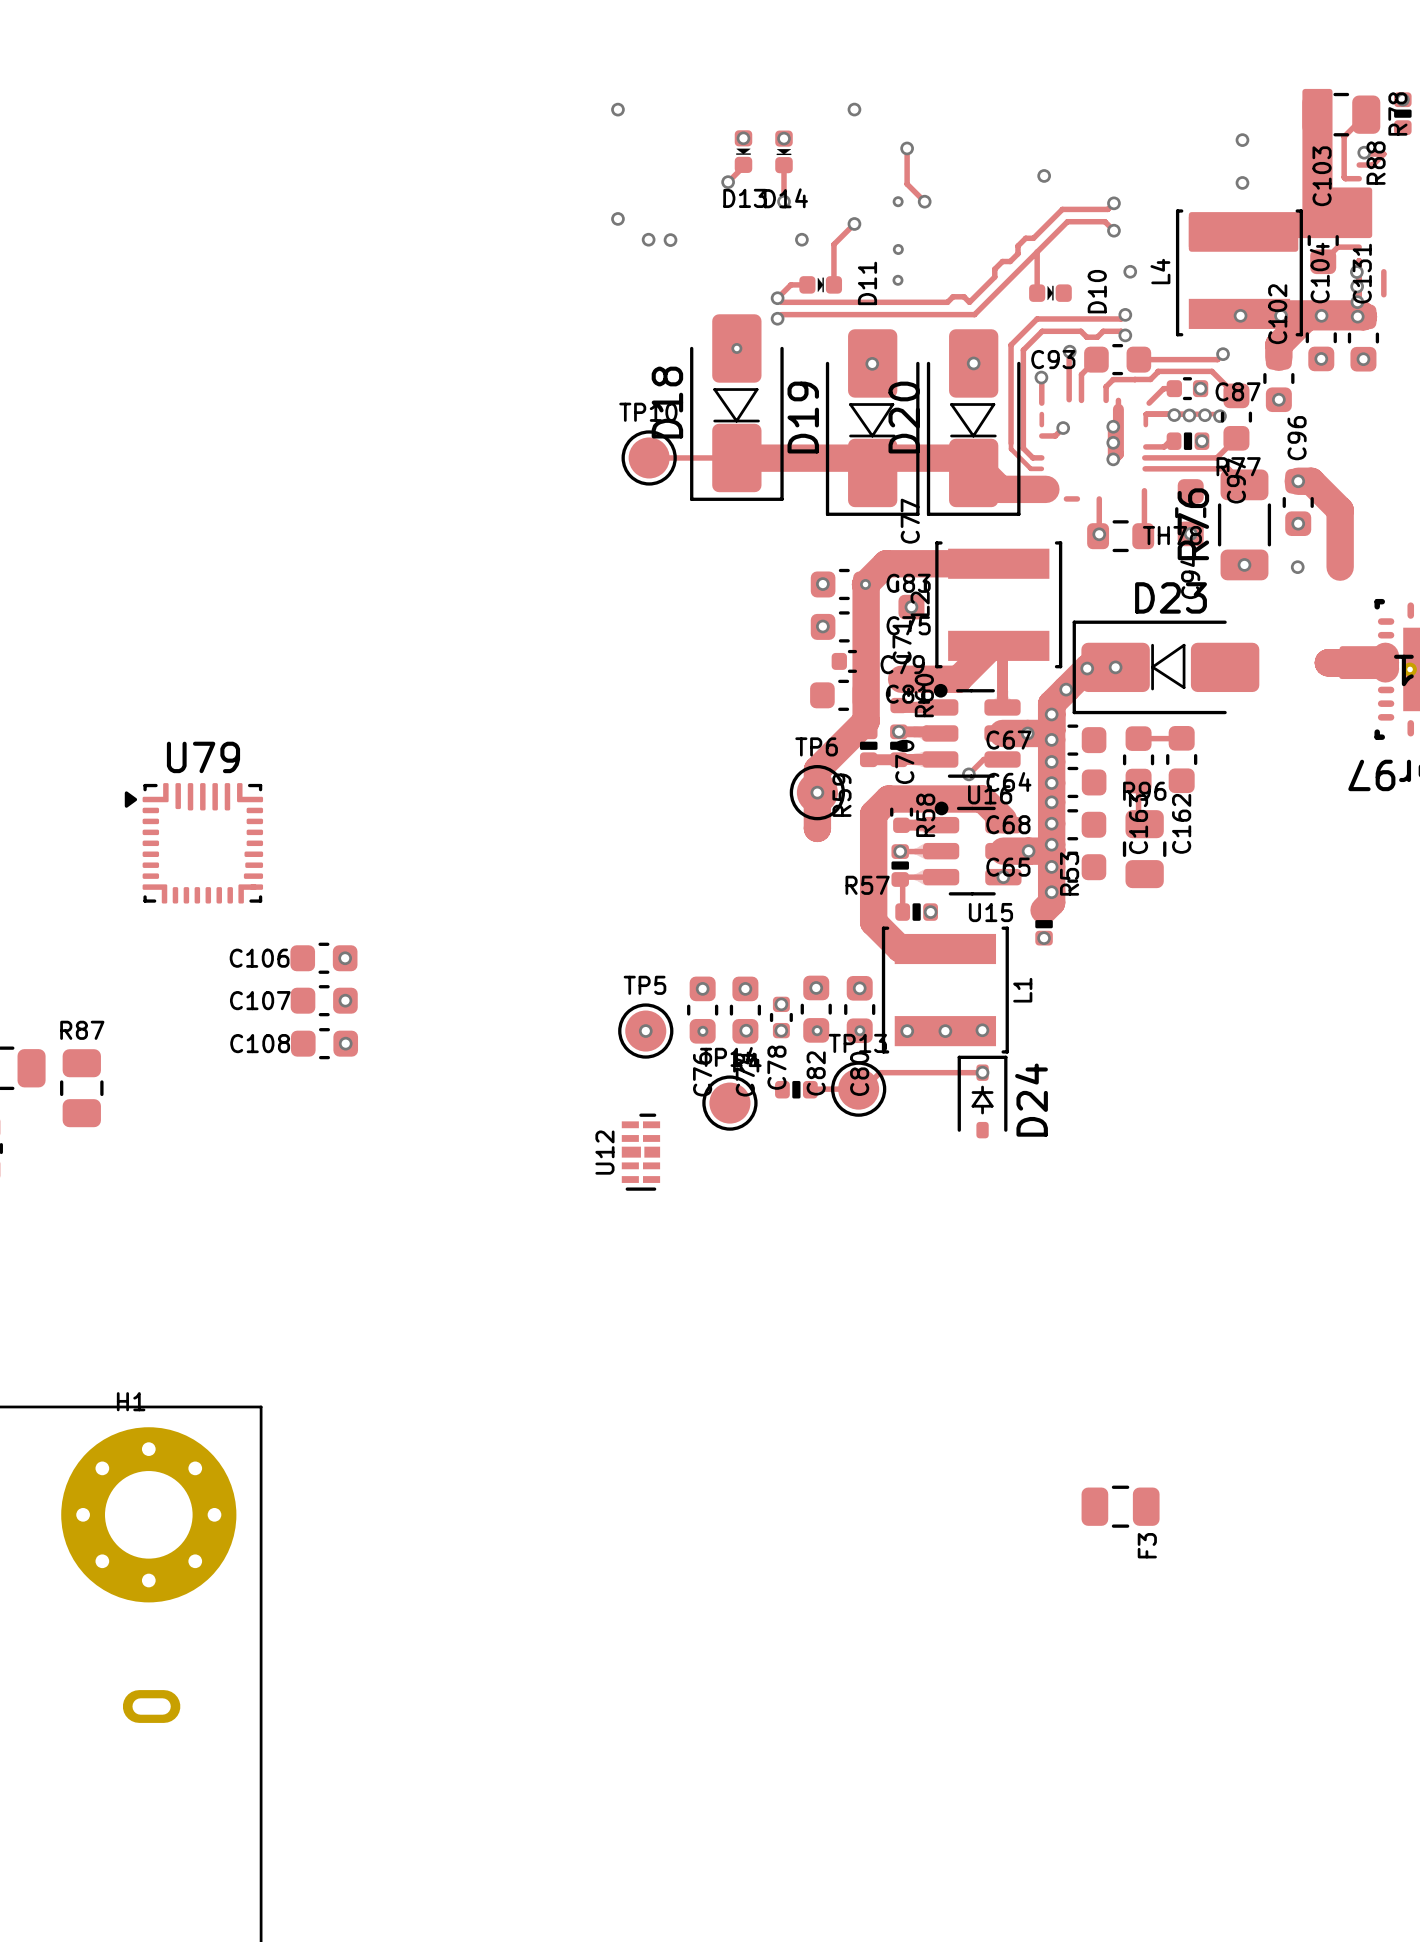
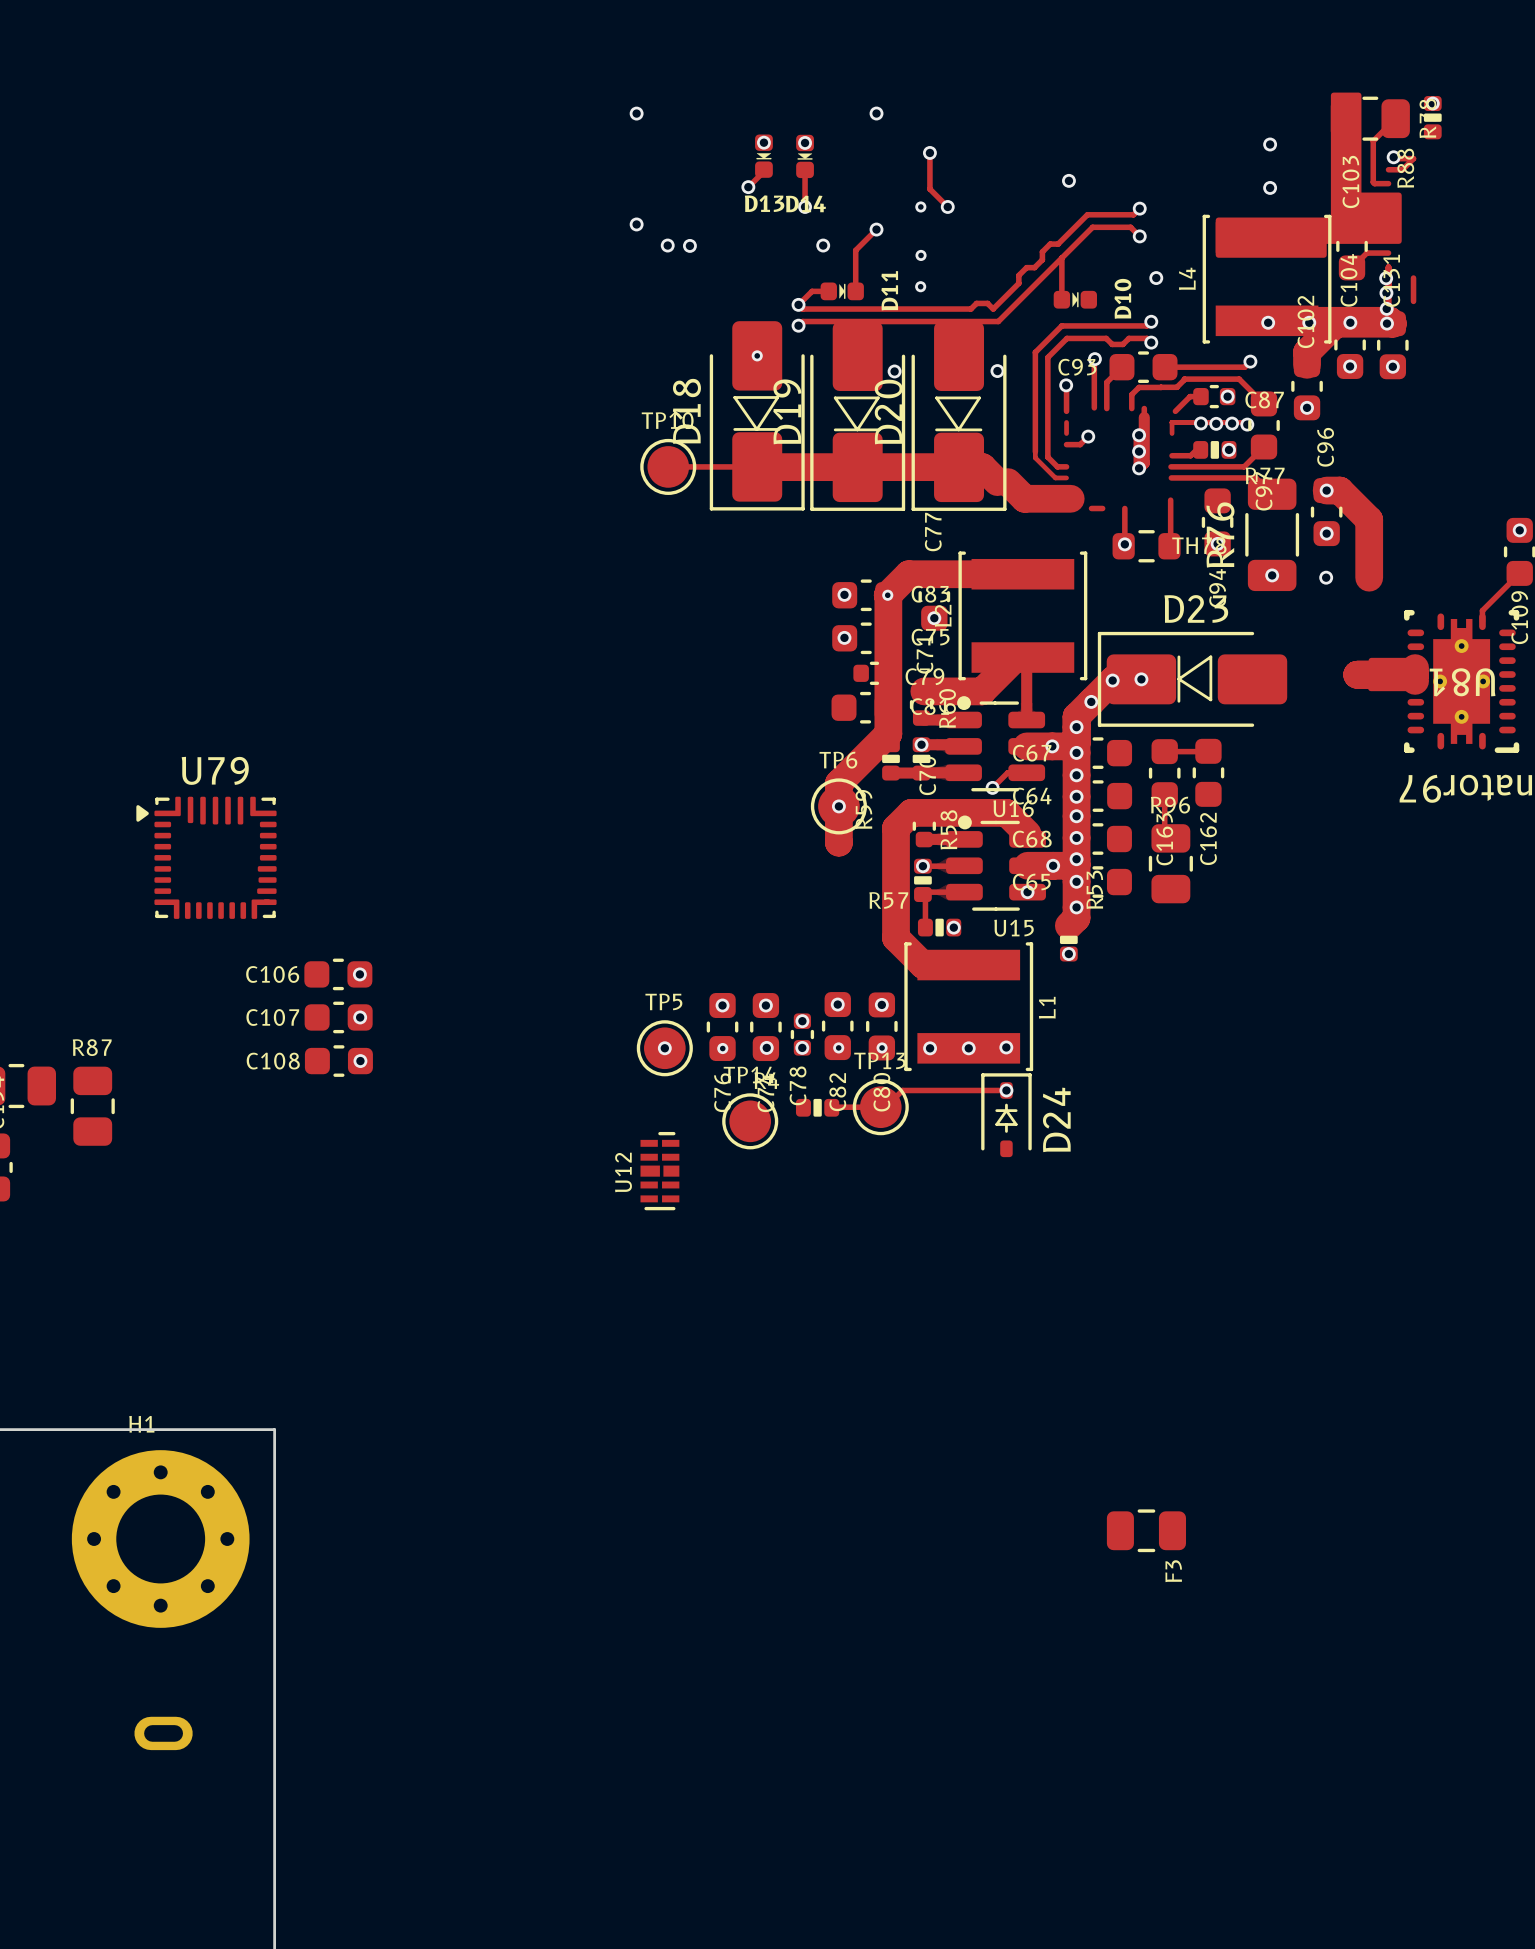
D19 position: (872, 422) -> (857, 416)
D20 position: (973, 422) -> (959, 416)

